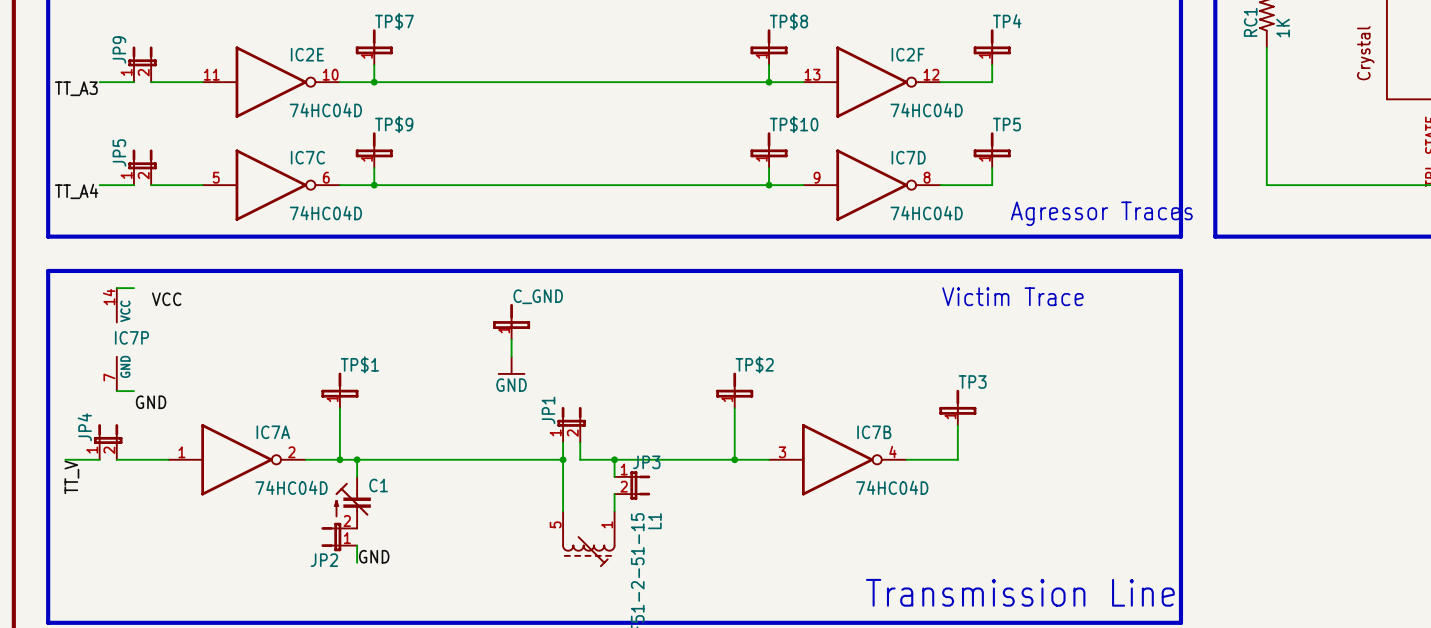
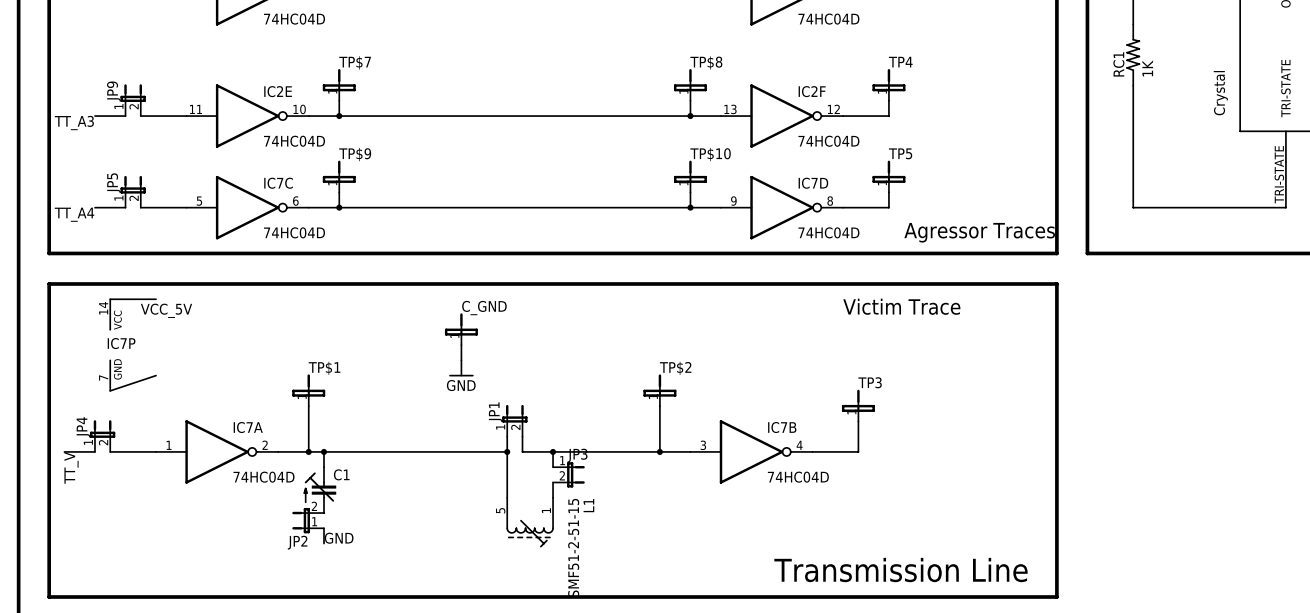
wire: none -> (125, 299) (156, 299)
label: VCC (166, 299) -> VCC_5V (166, 310)
wire: (116, 391) (133, 391) -> (110, 390) (156, 375)
label: GND (151, 402) -> none

